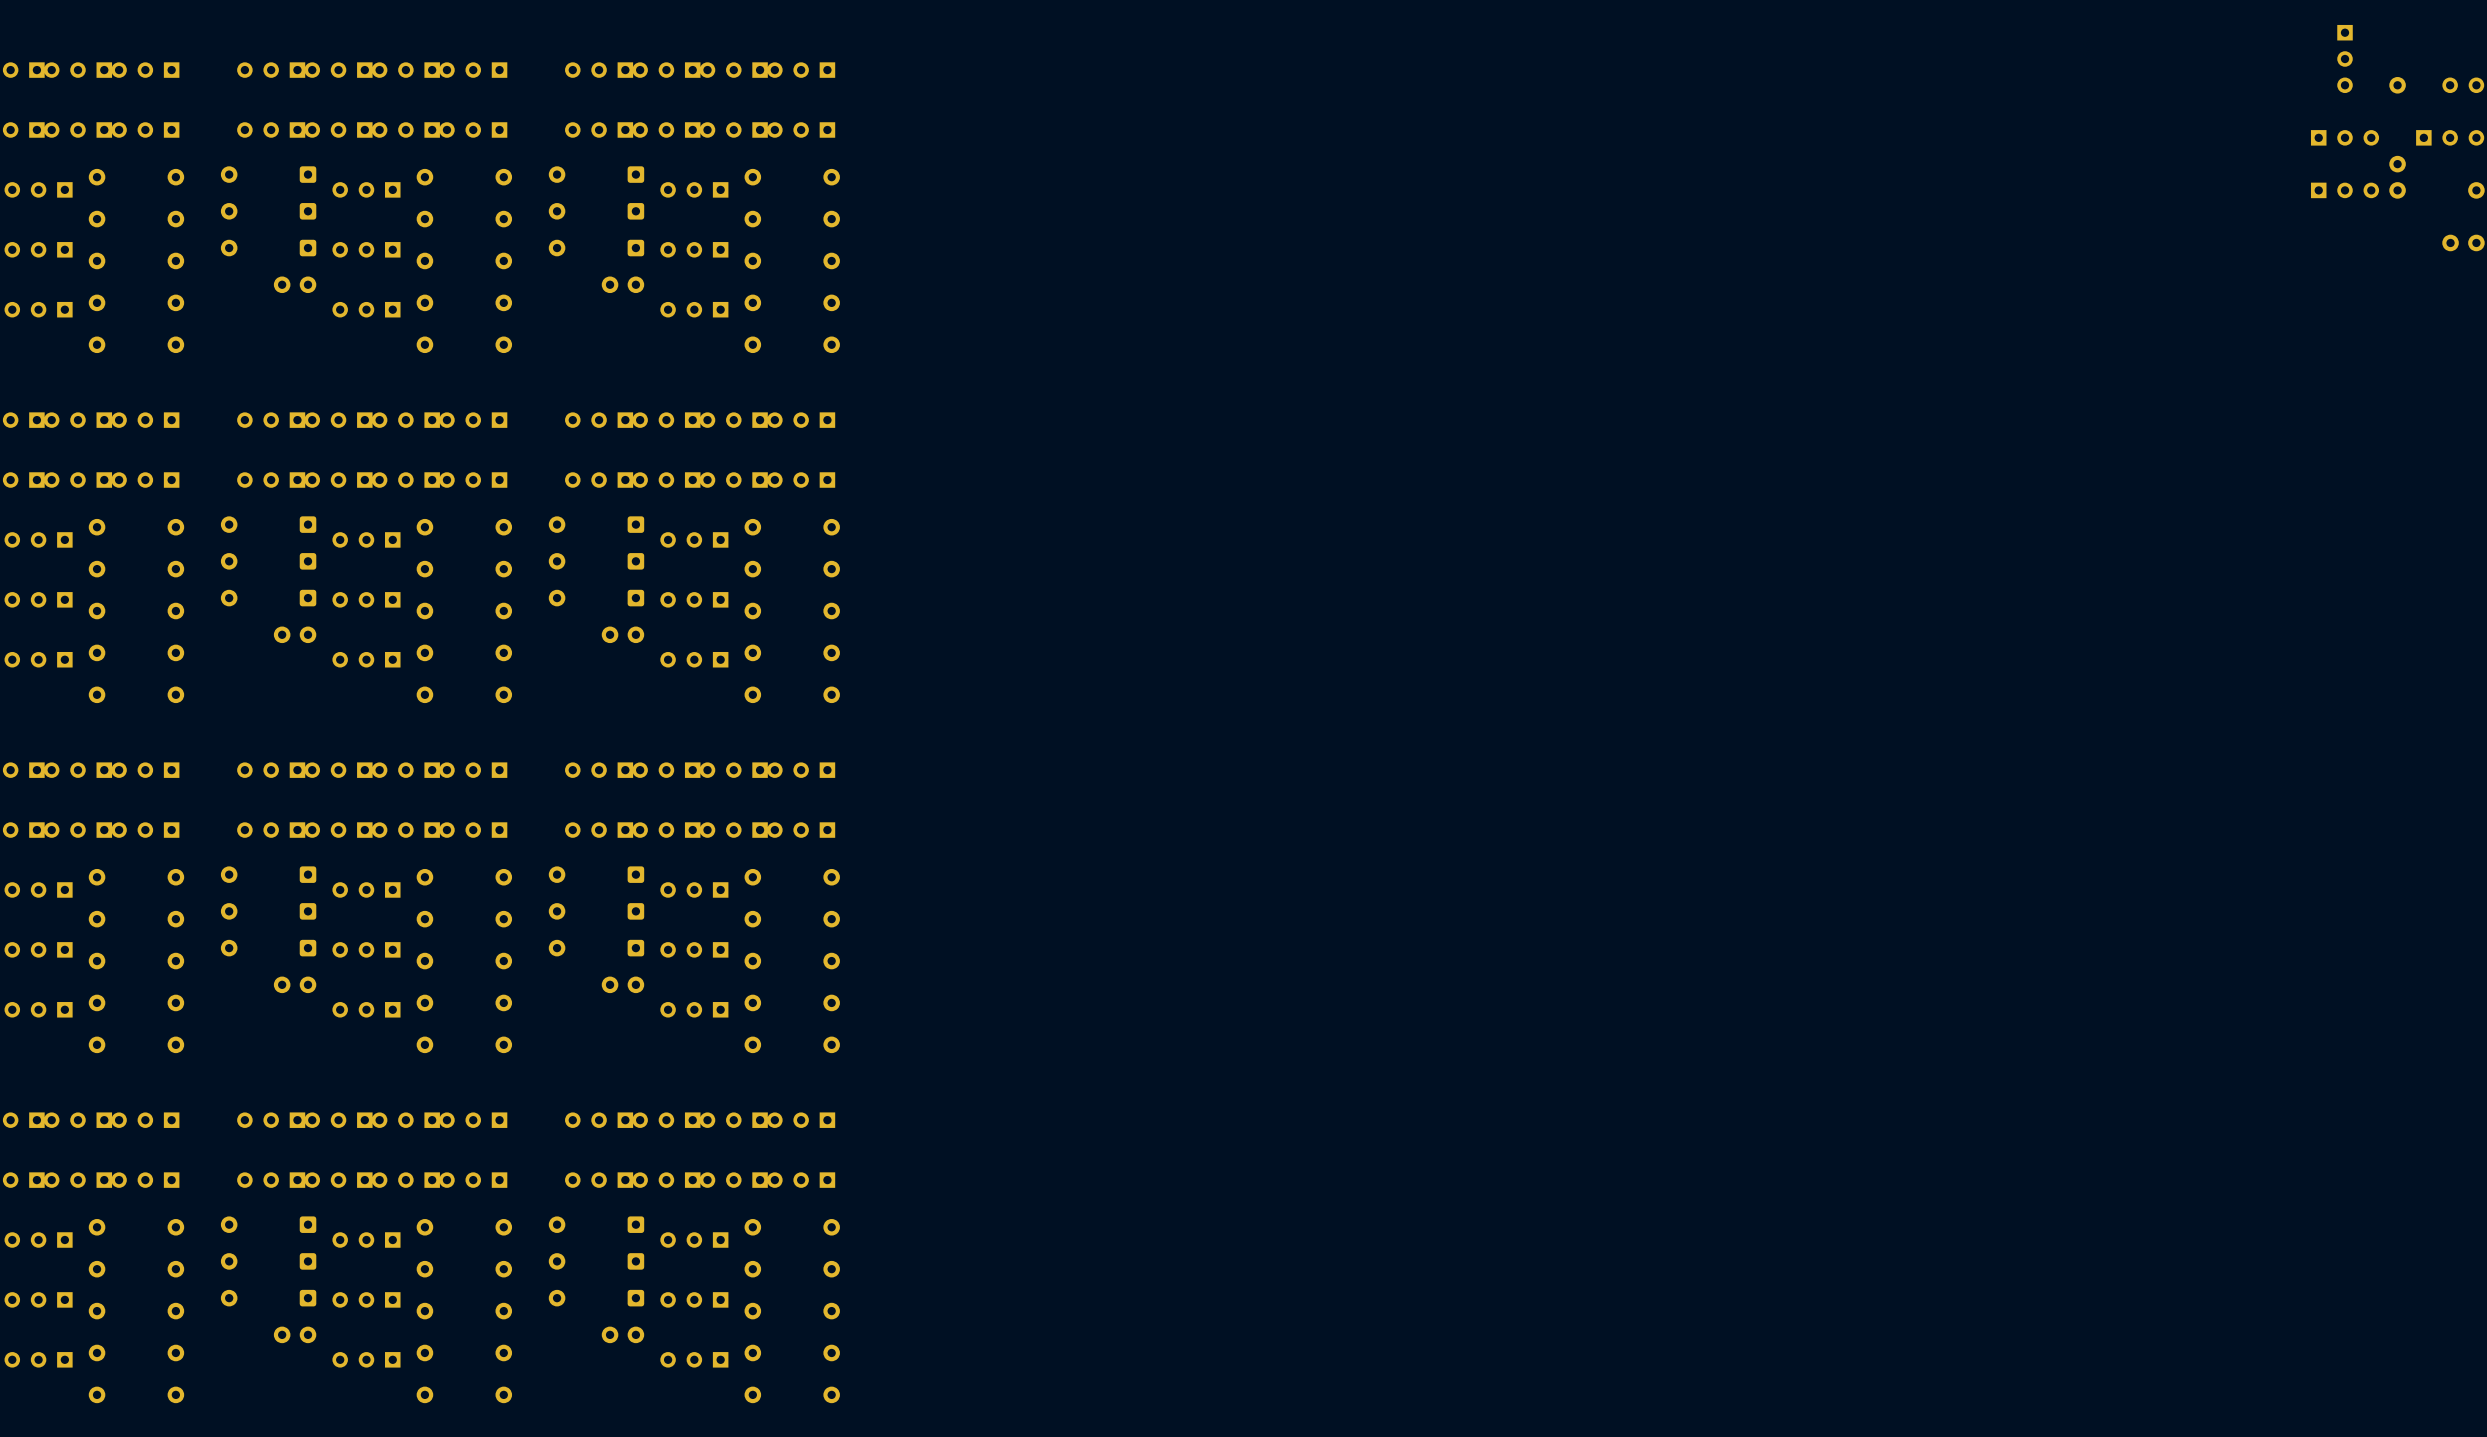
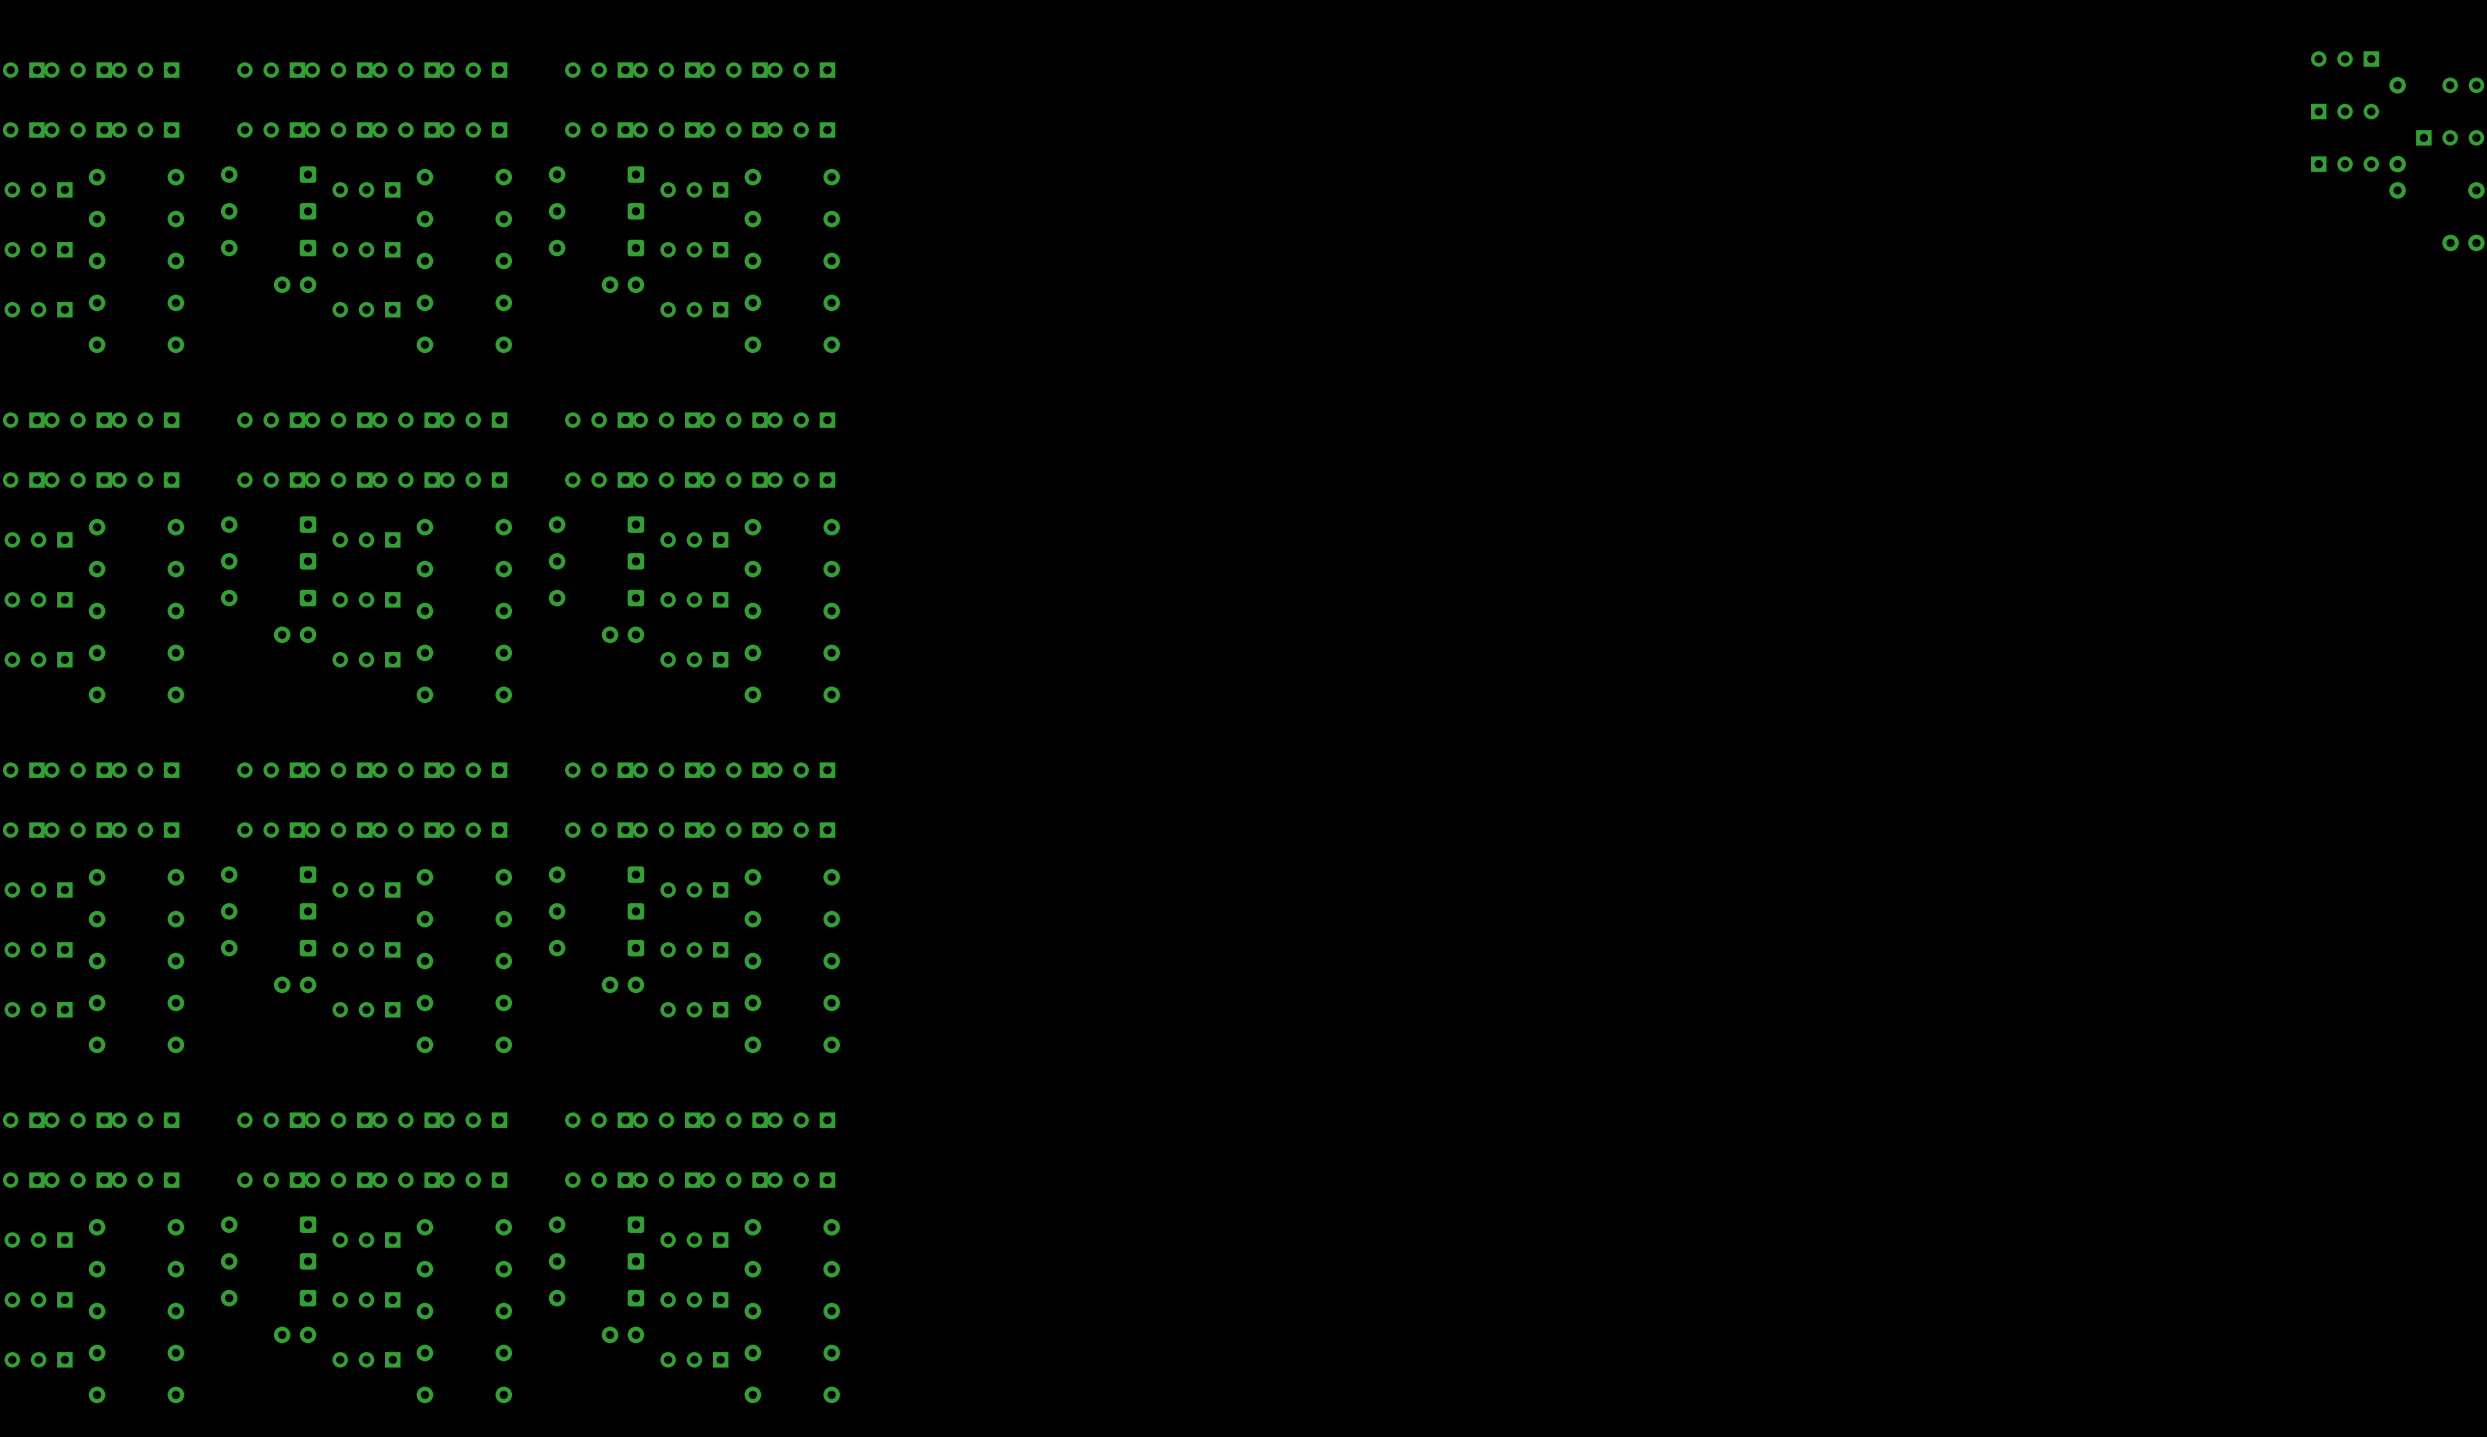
part rotation: 0° (2345, 59) -> 90° clockwise (2345, 59)
part: none -> (2345, 111)
part: (2345, 137) -> none
part: none -> (2345, 164)
part: (2345, 190) -> none

